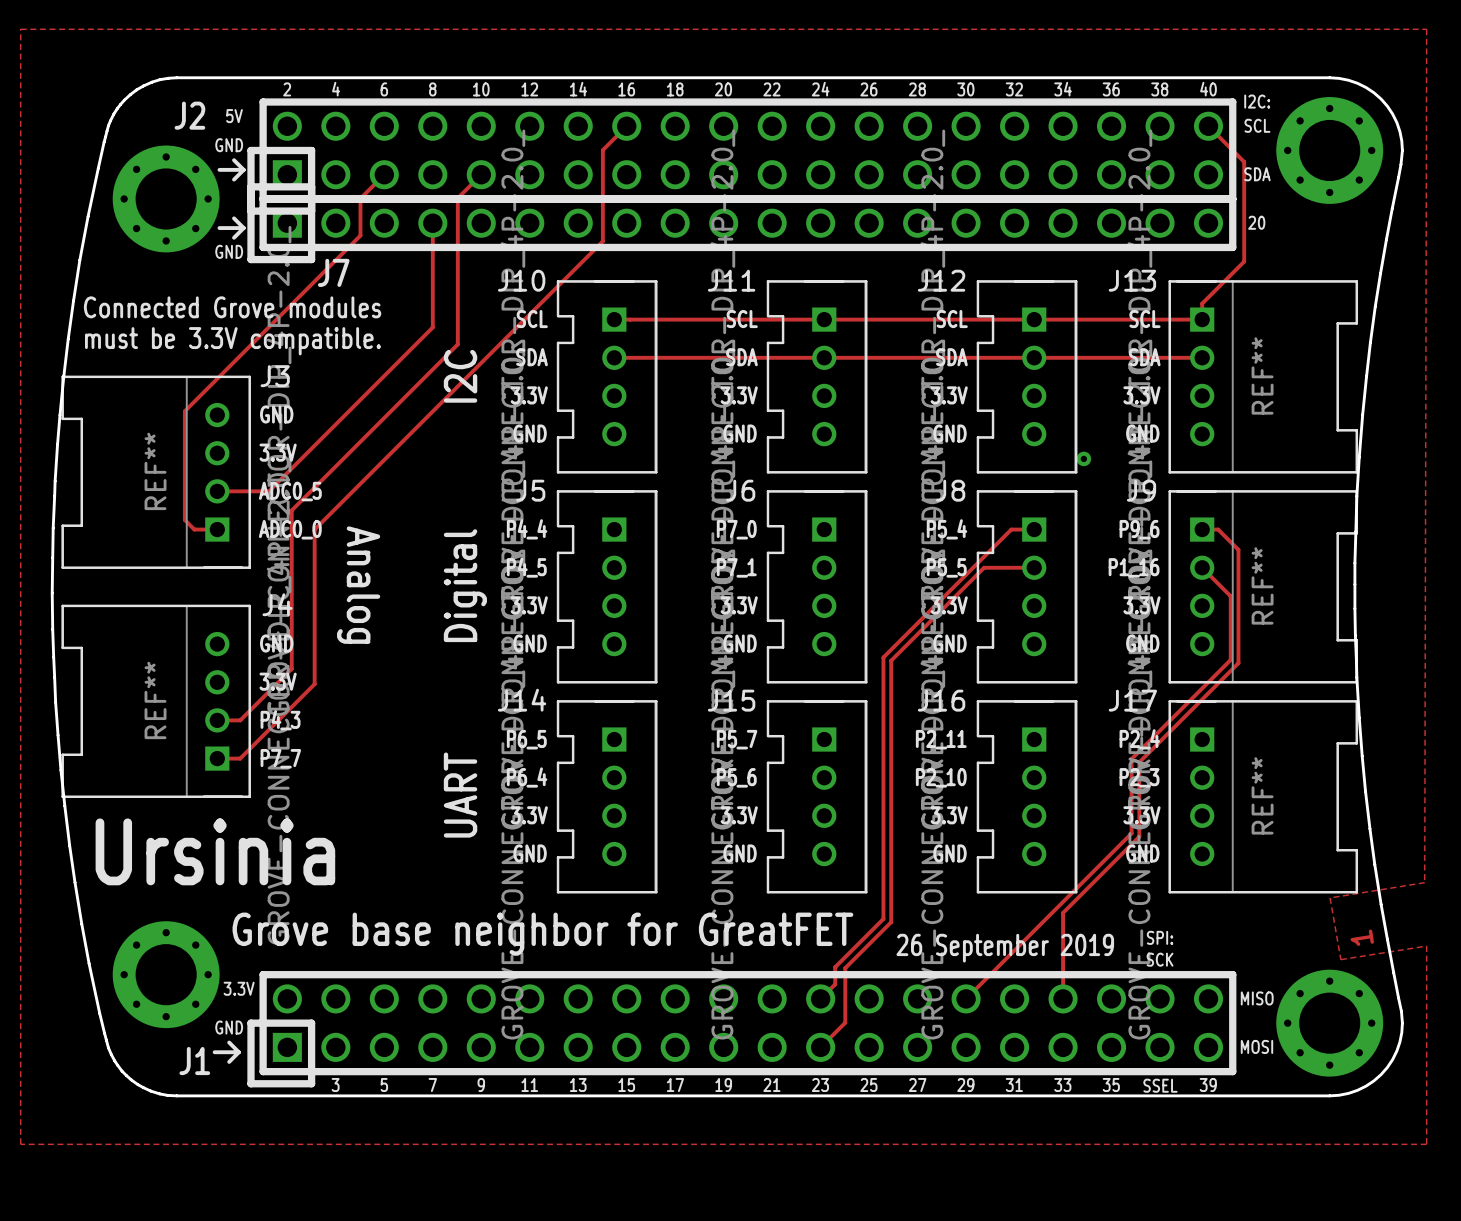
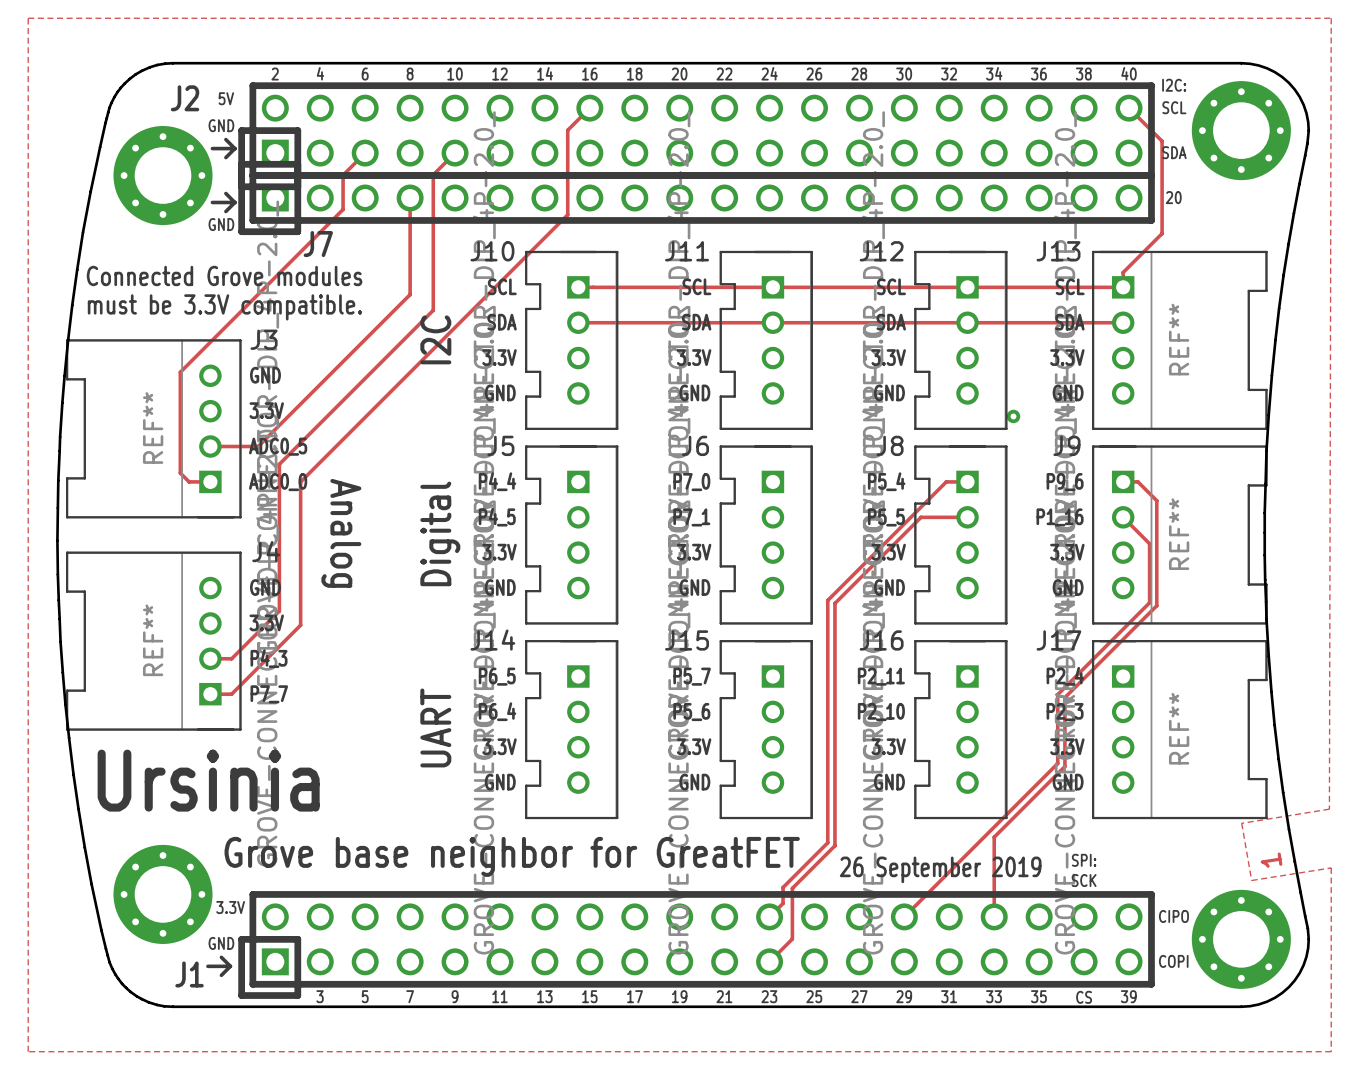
text: MISO (1257, 998) -> CIPO (1173, 916)
text: MOSI (1256, 1046) -> COPI (1173, 961)
text: SSEL (1160, 1085) -> CS (1084, 997)

